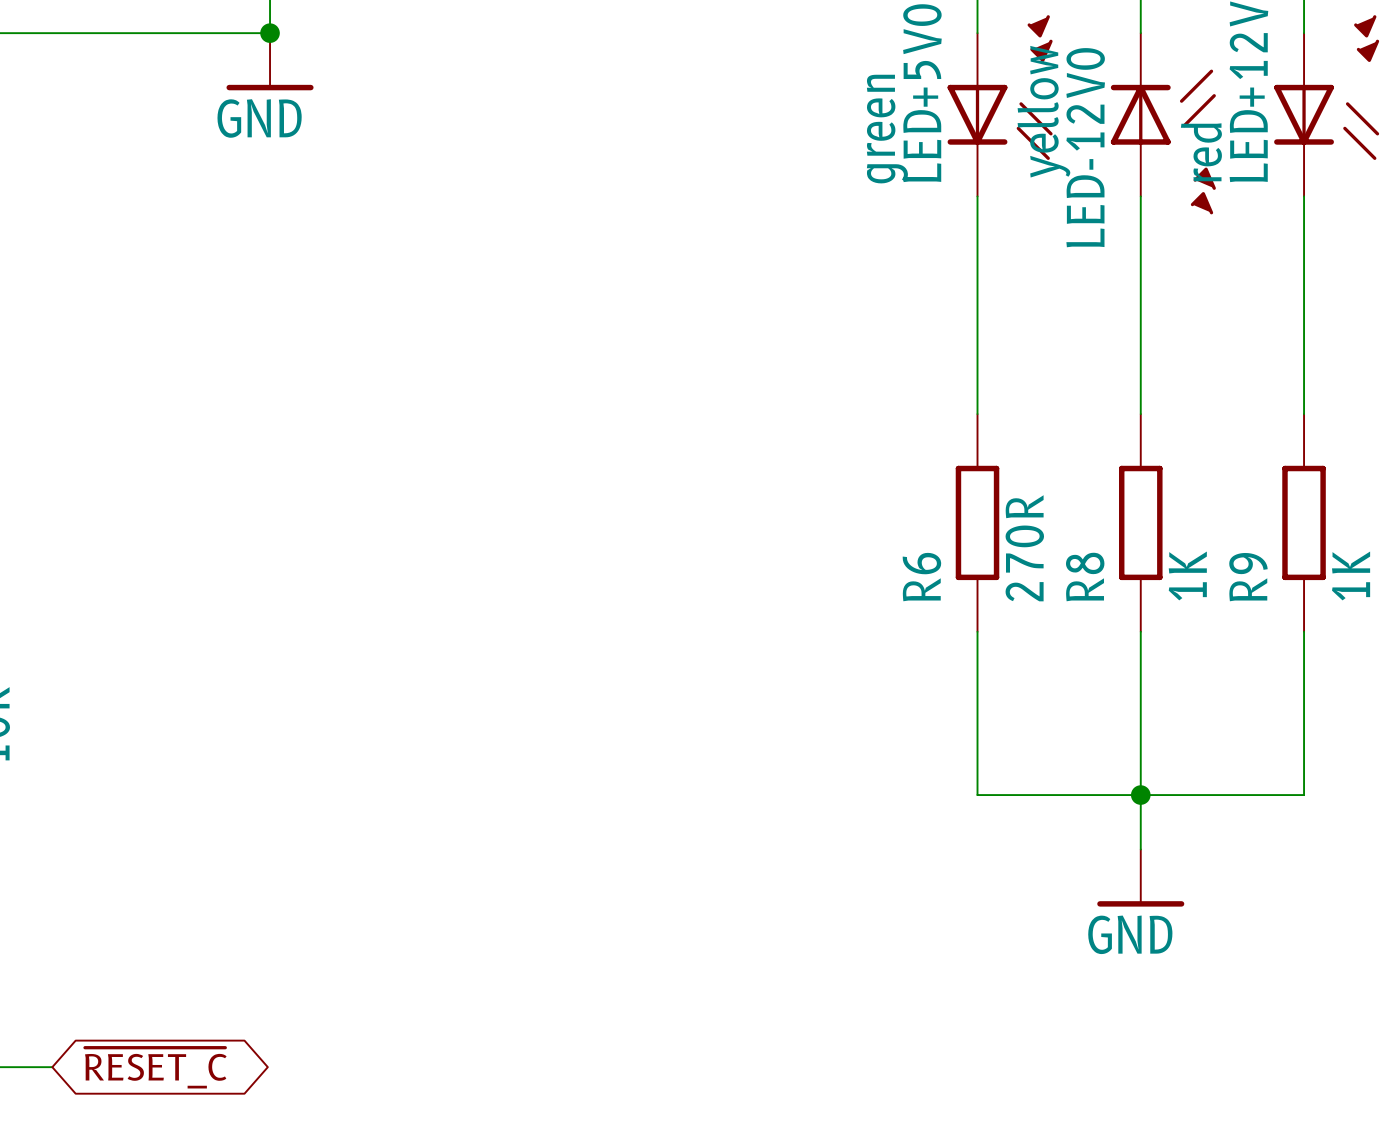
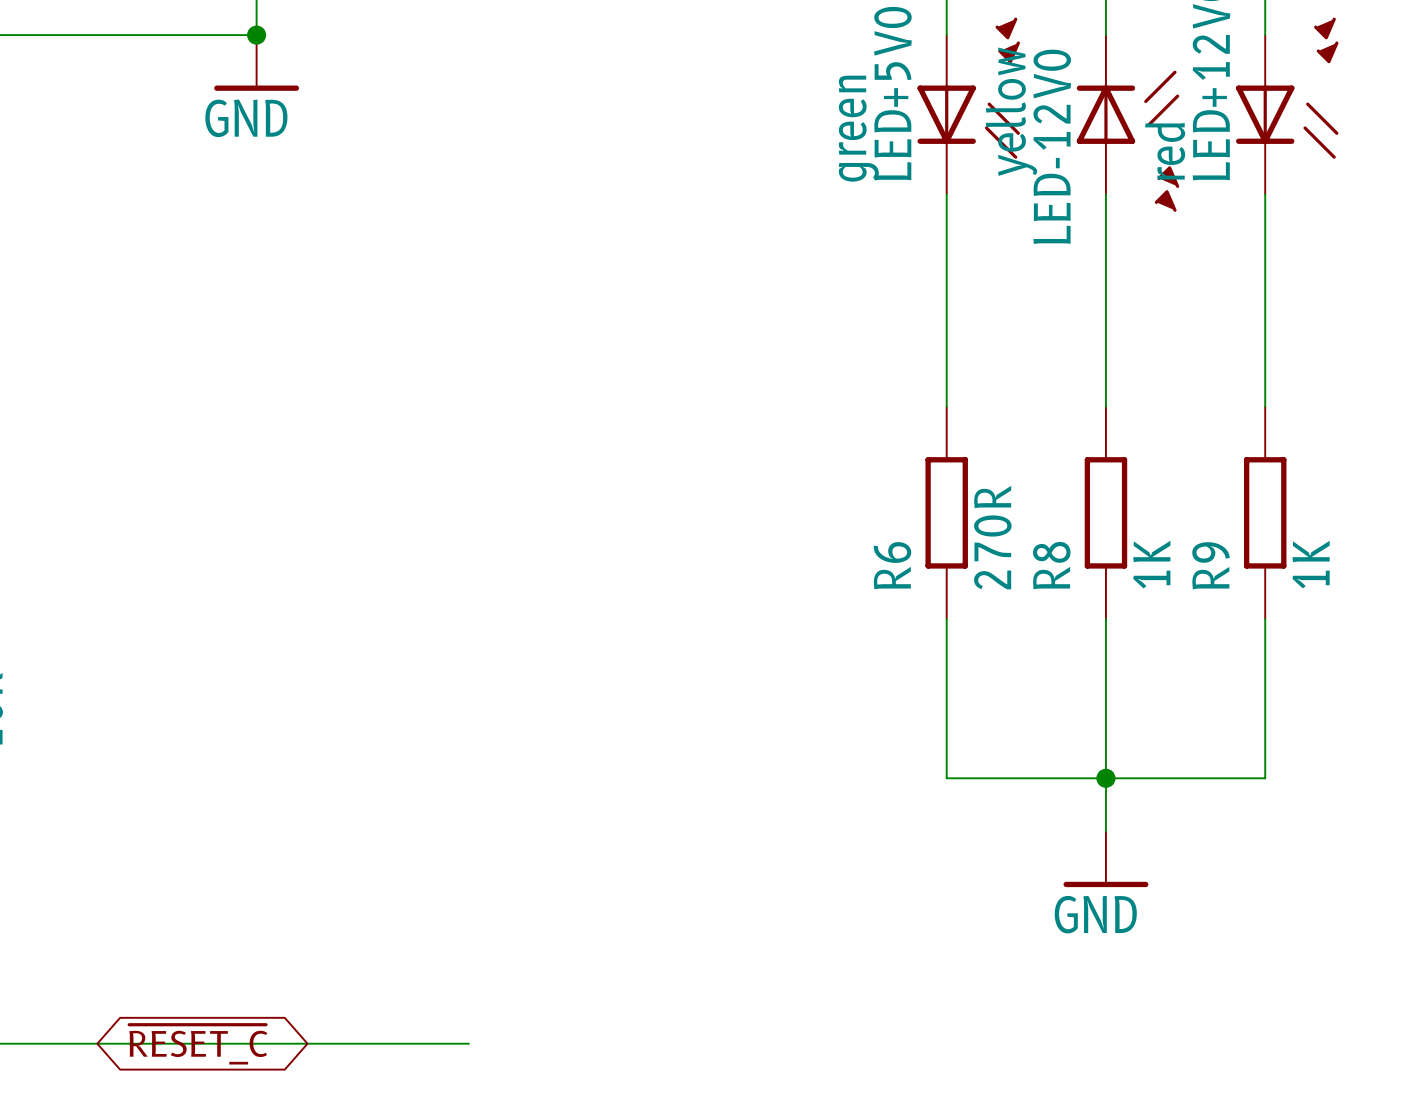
wire: none -> (44, 1043) (468, 1043)
global label position: ~{RESET_C} (155, 1068) -> ~{RESET_C} (198, 1044)

